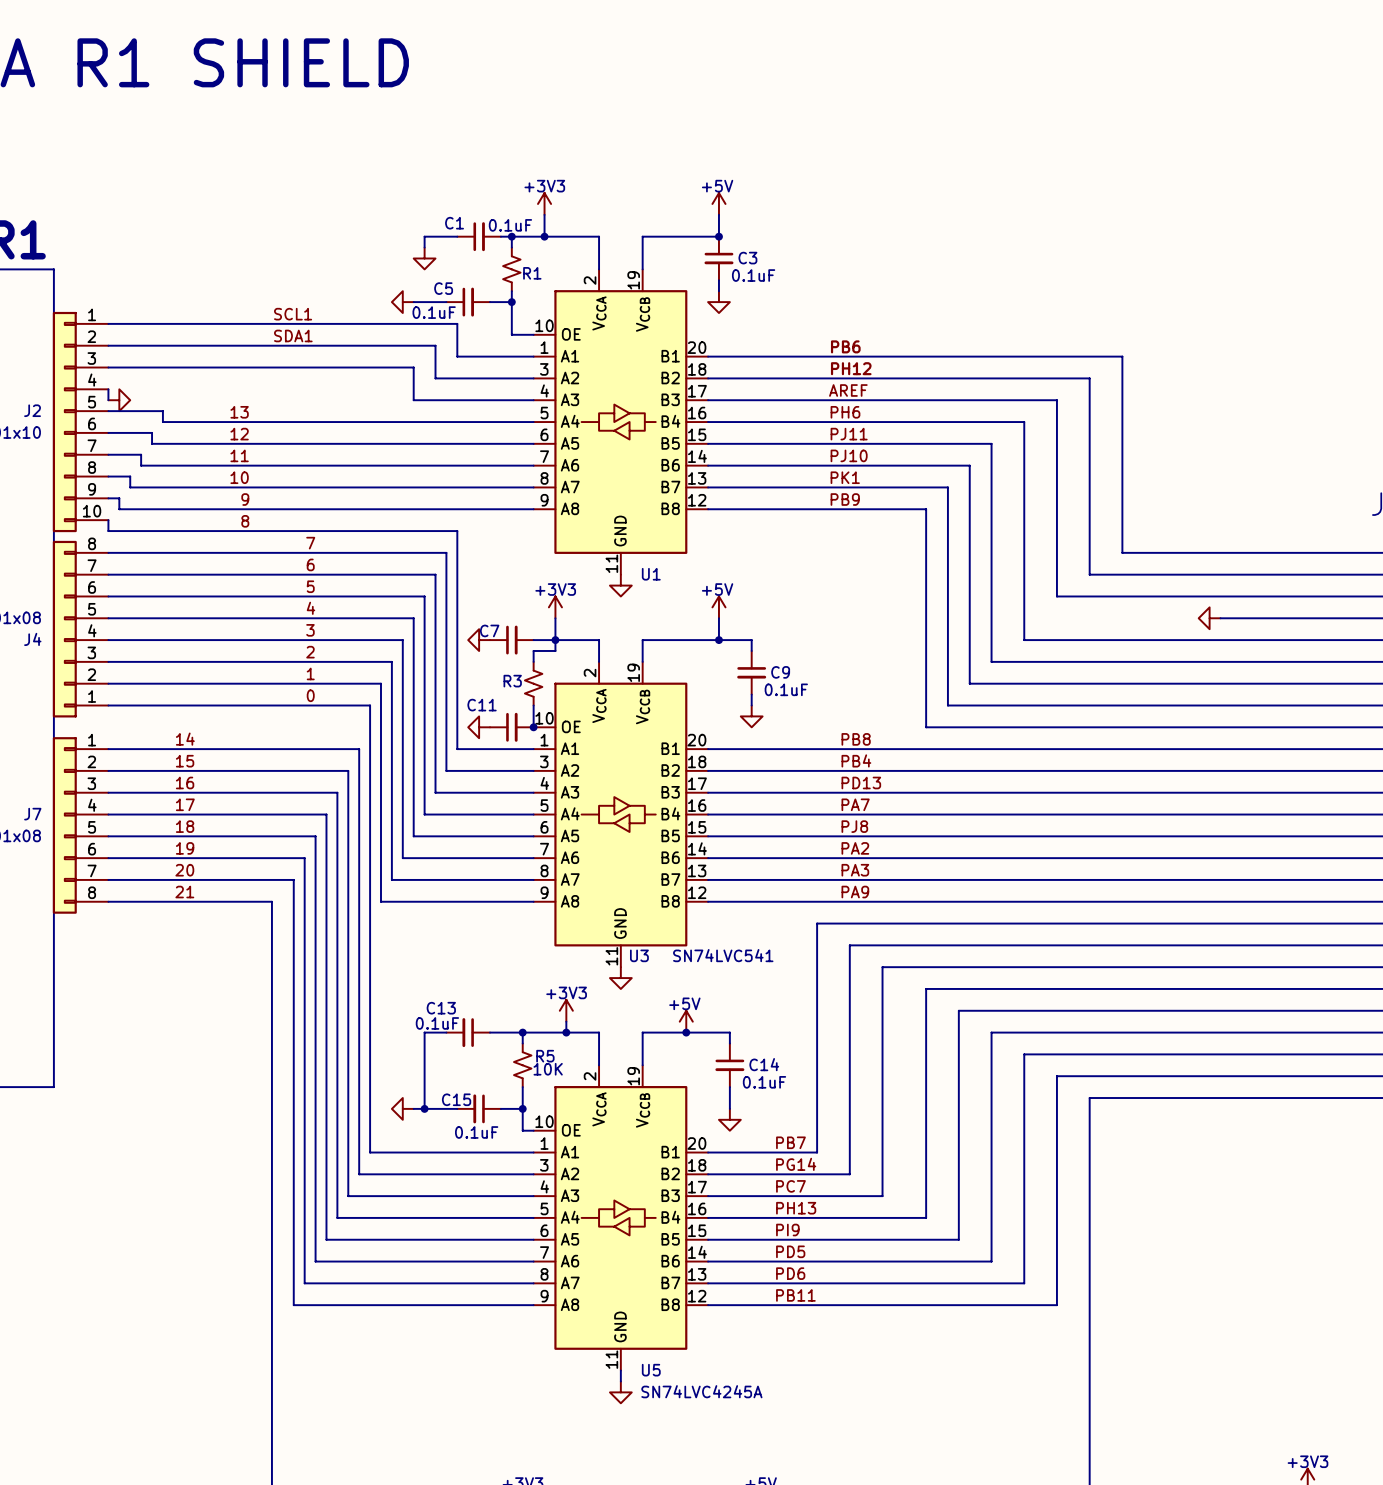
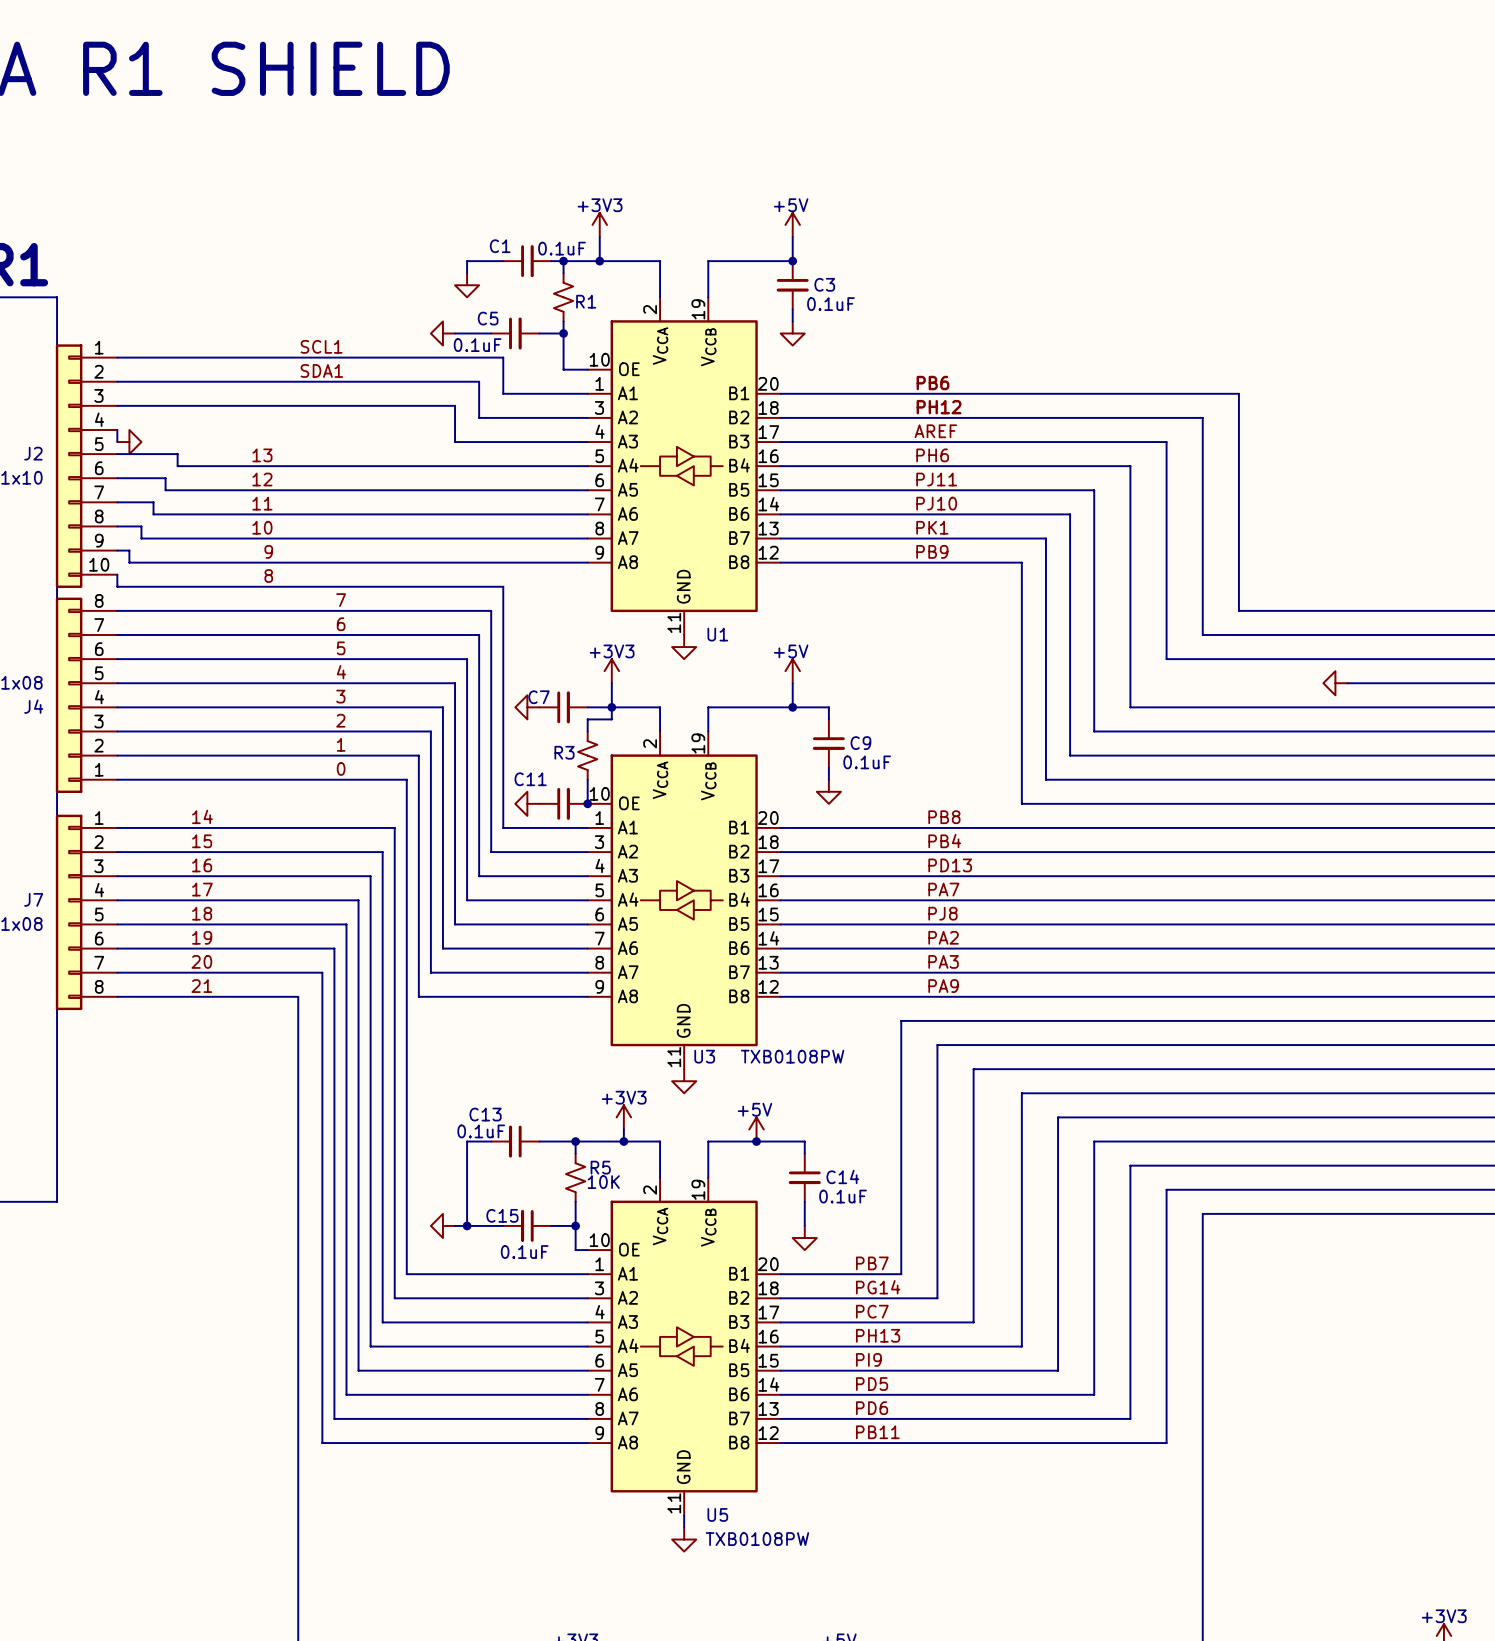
U3 value: SN74LVC541 (723, 955) -> TXB0108PW (792, 1056)
U5 value: SN74LVC4245A (701, 1391) -> TXB0108PW (757, 1539)

